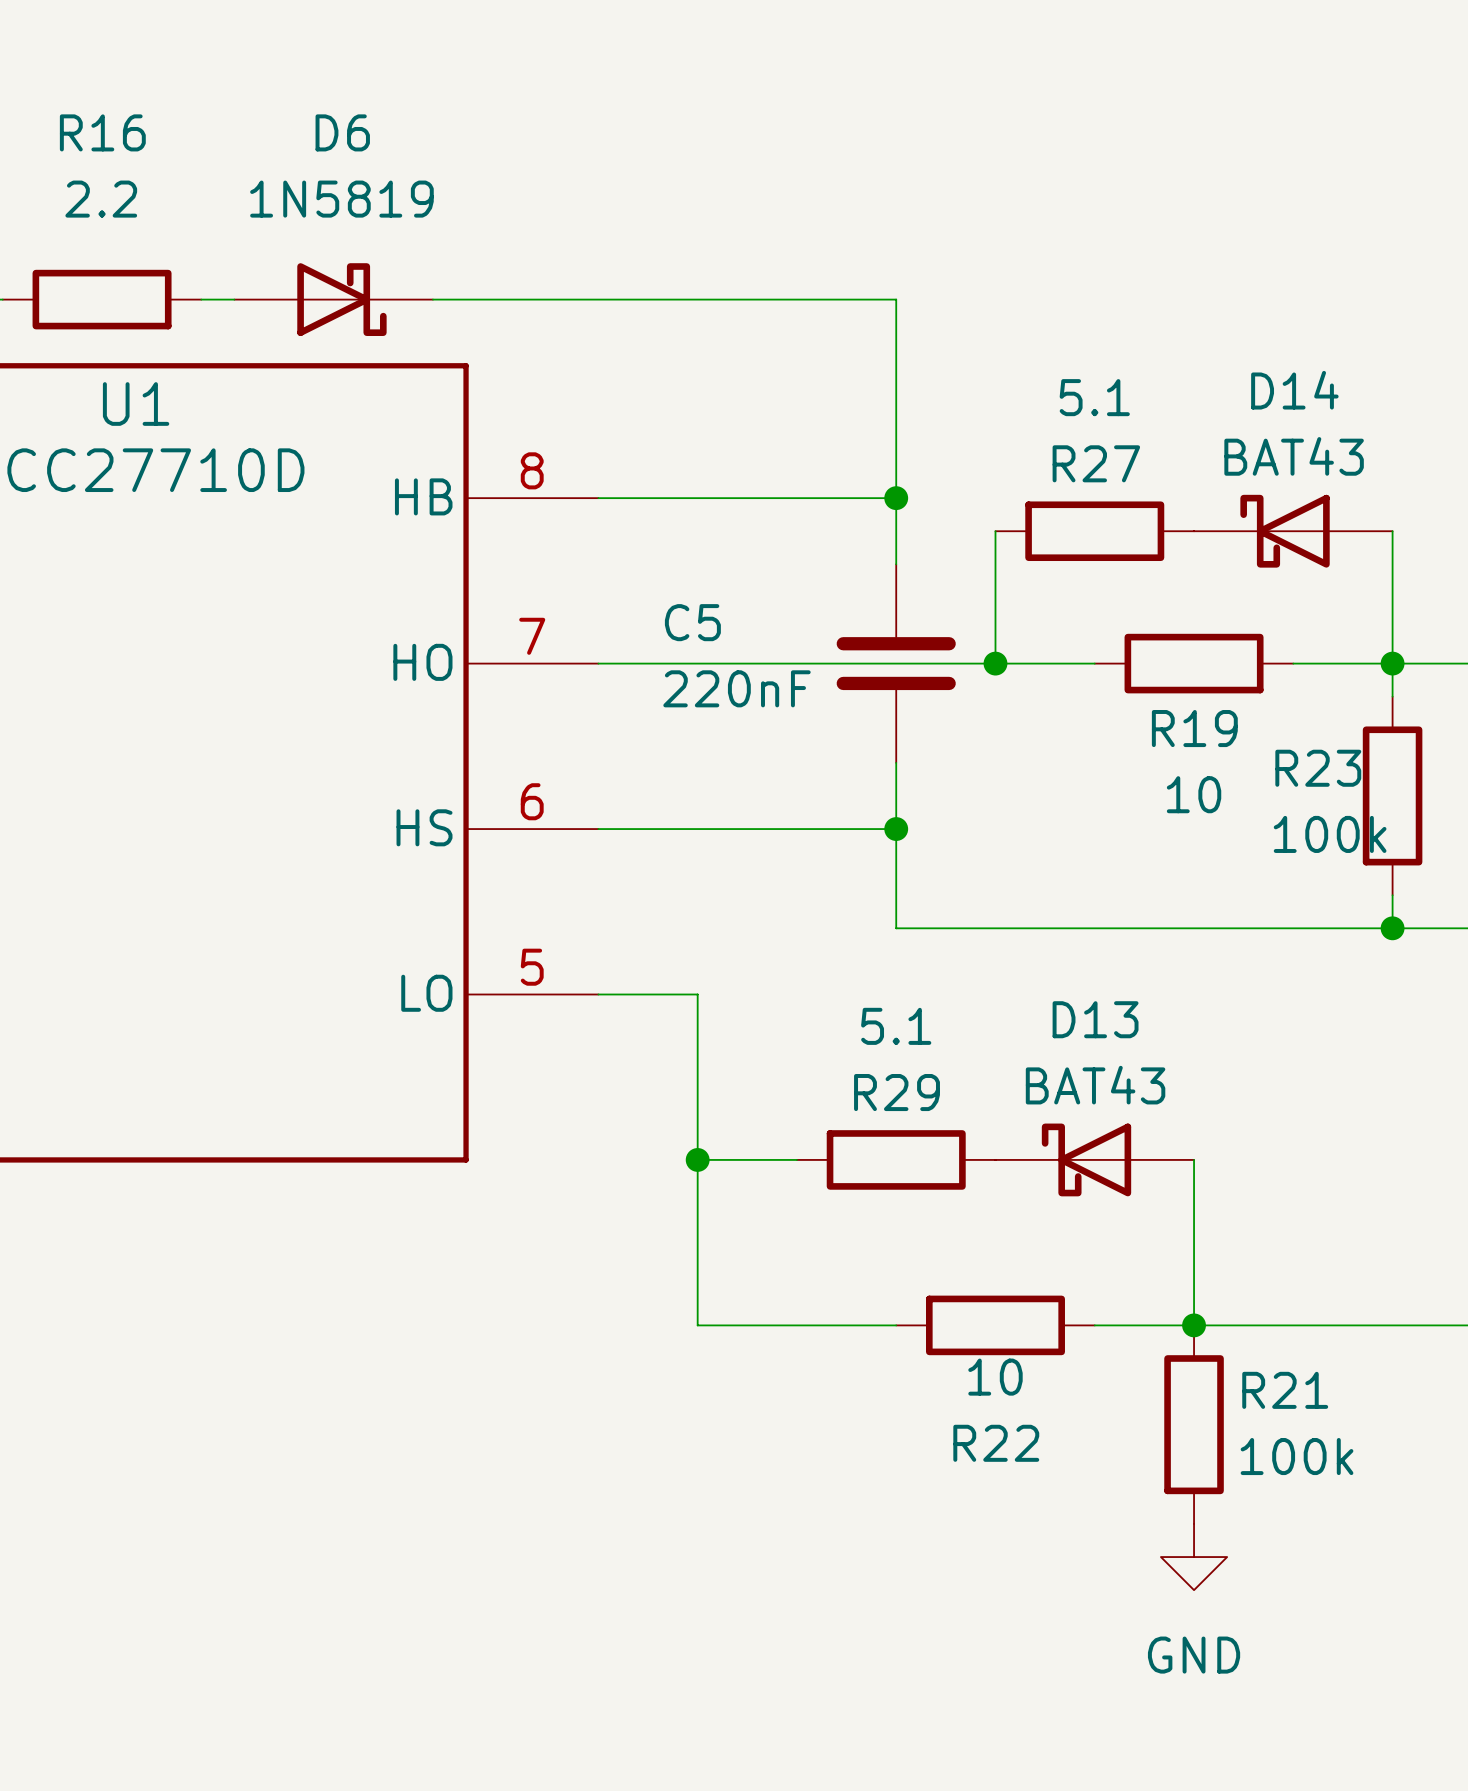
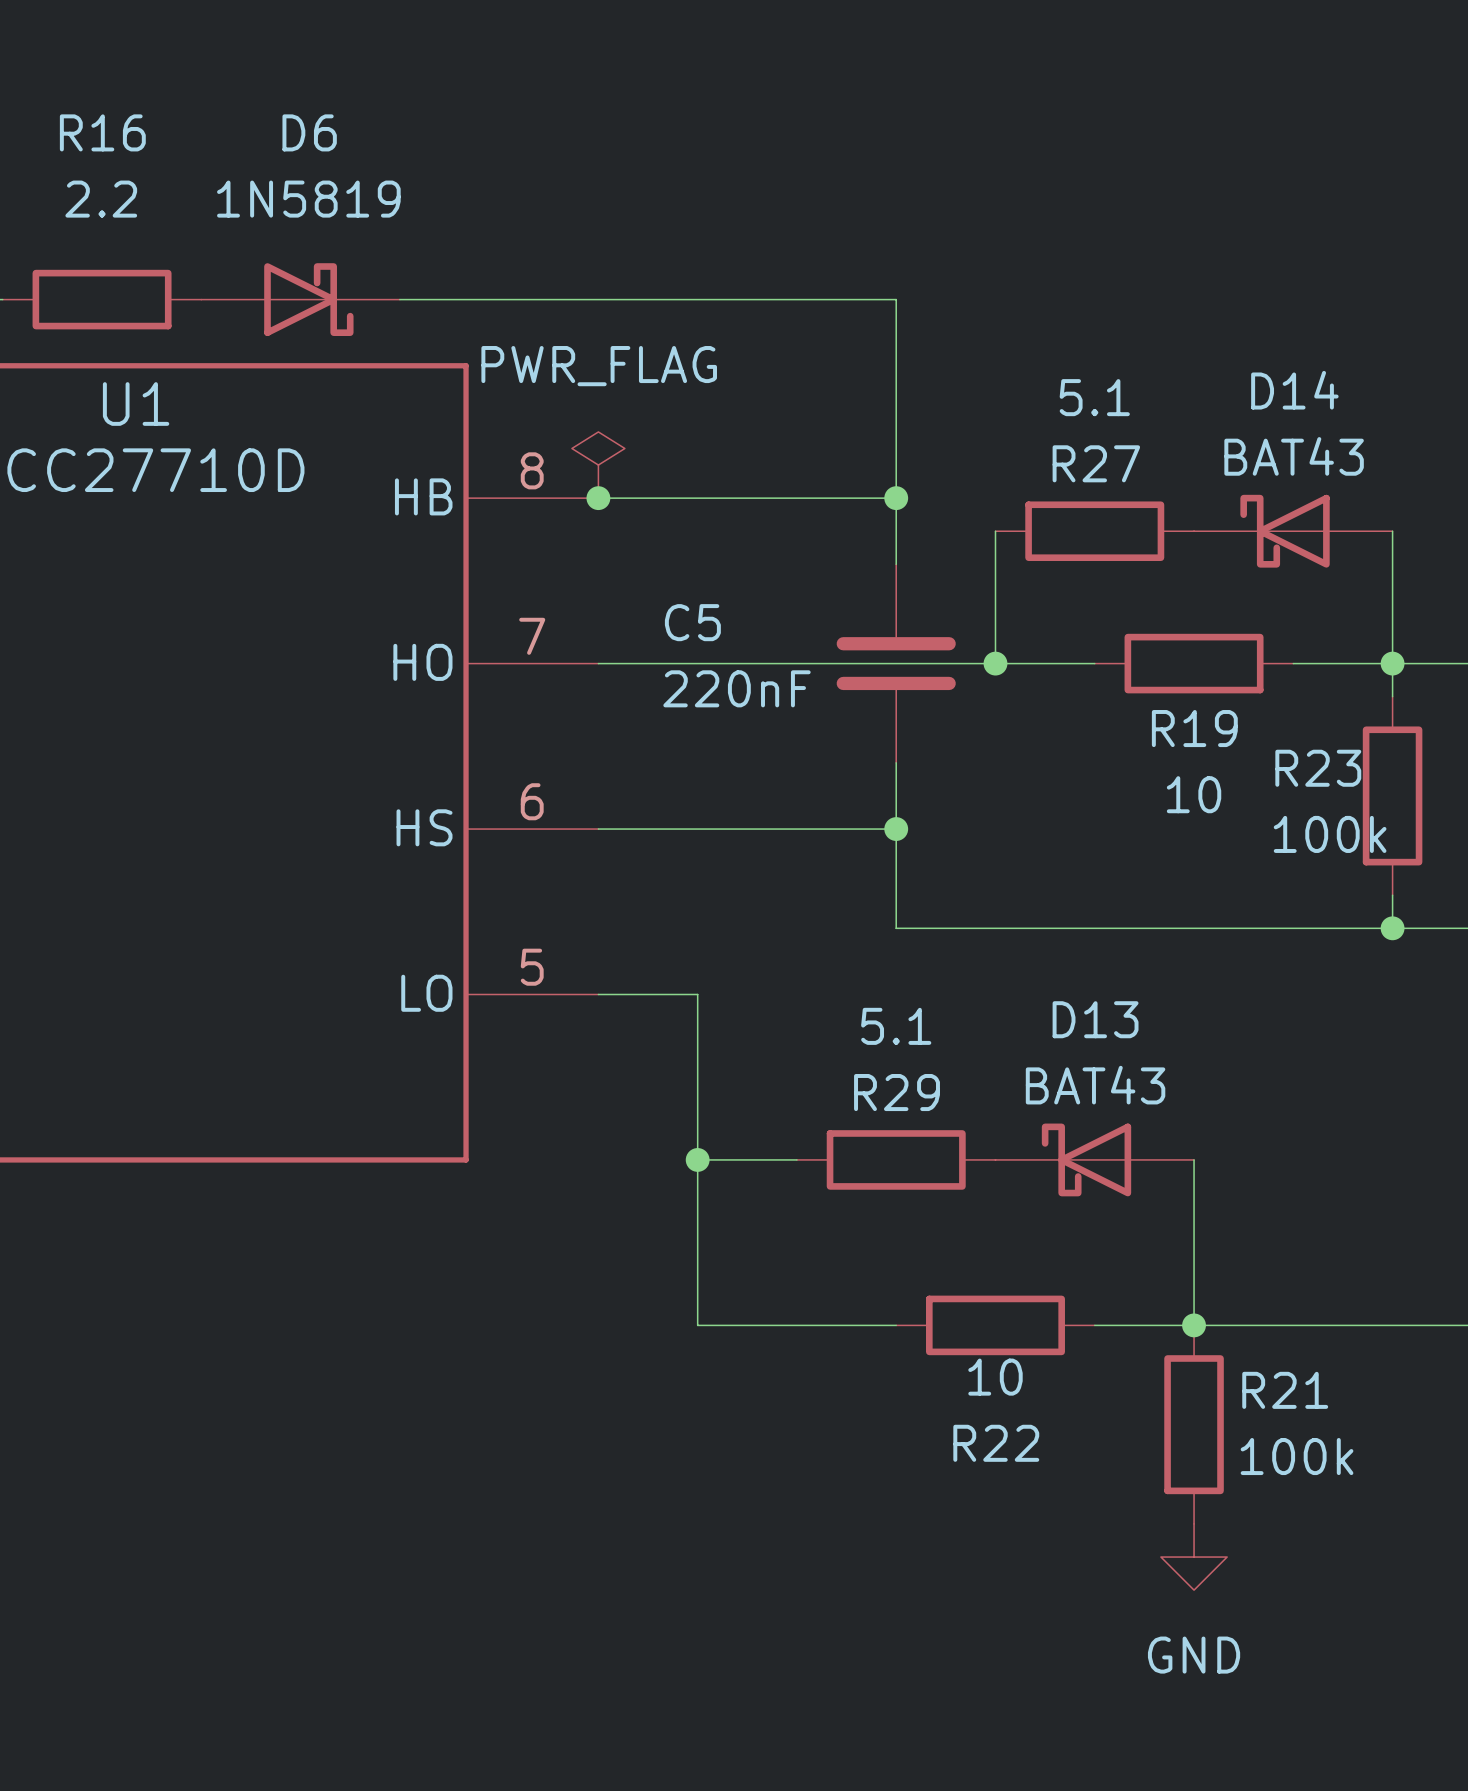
D6 position: (333, 299) -> (300, 299)
power symbol: none -> PWR_FLAG (598, 465)
junction: none -> (598, 498)

